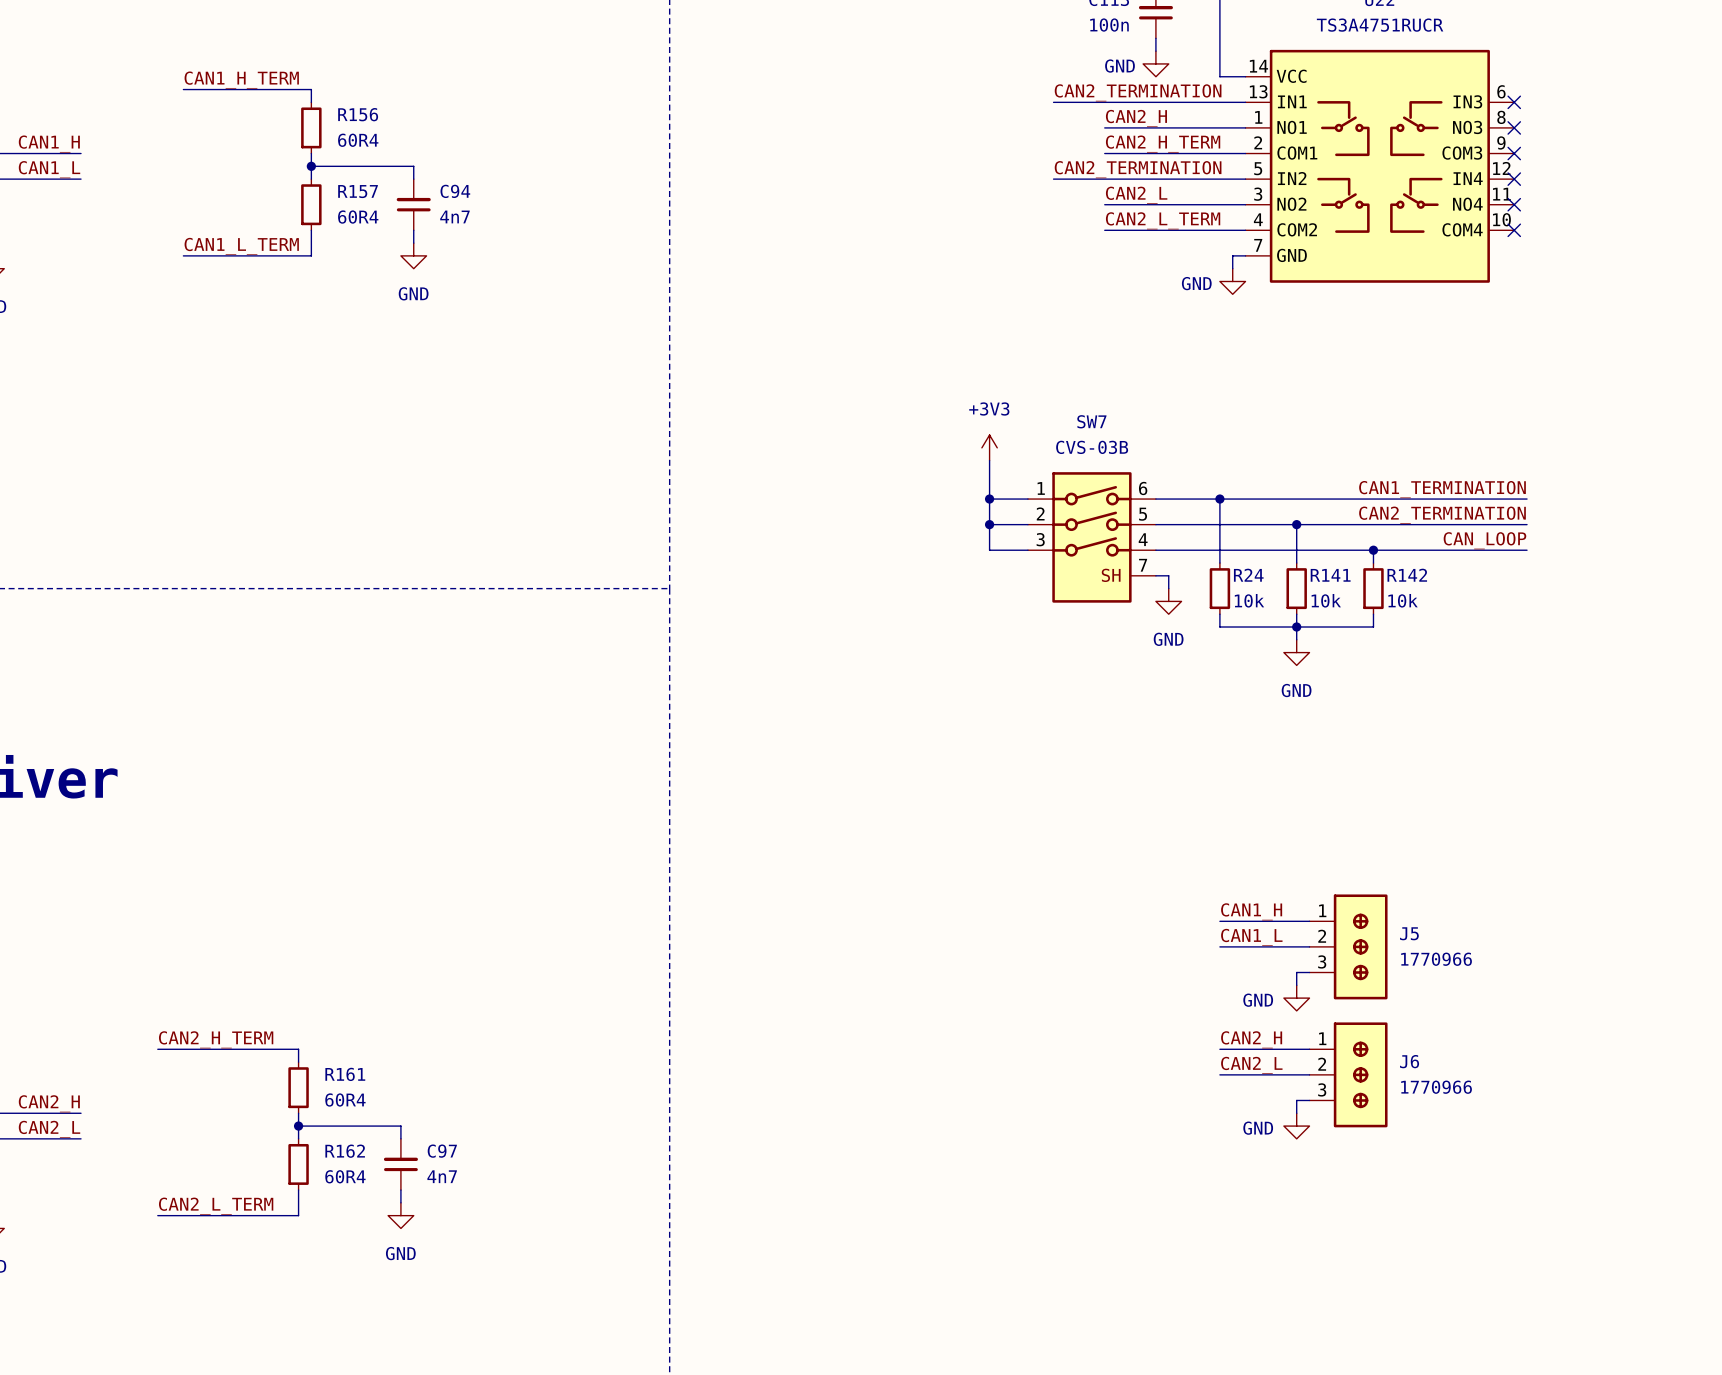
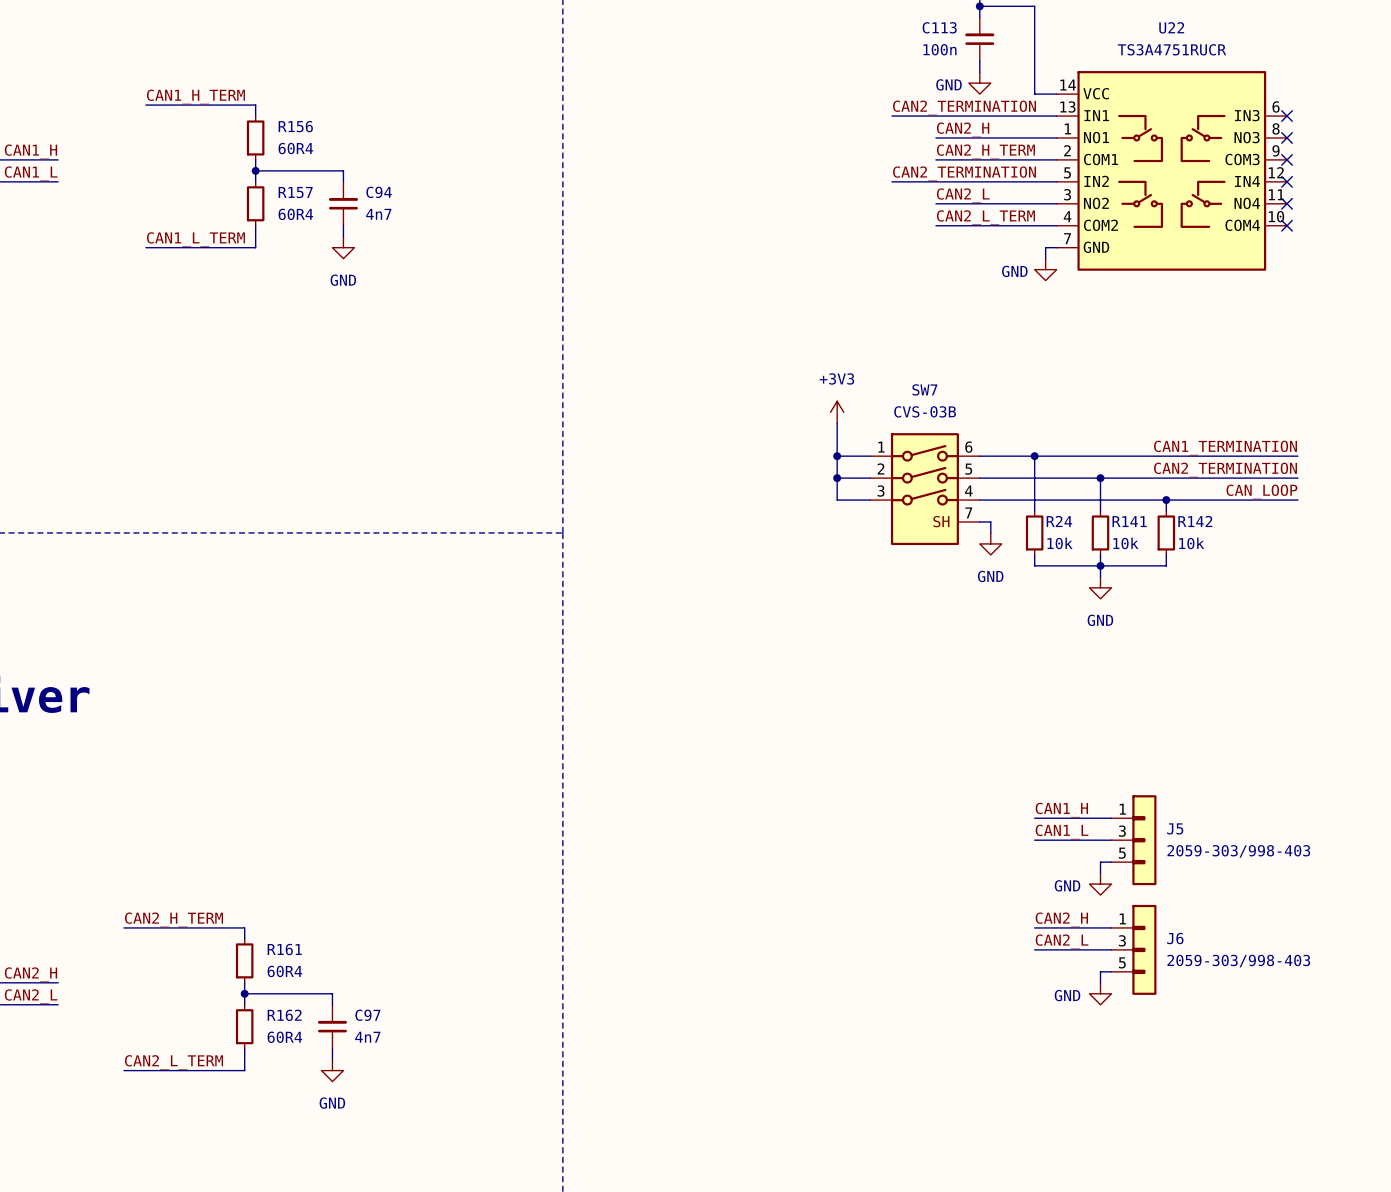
J5 symbol: [1309, 894, 1388, 1000] -> [1111, 795, 1157, 886]
J5 text: 1770966 (1436, 959) -> 2059-303/998-403 (1238, 851)
J6 symbol: [1309, 1022, 1388, 1128] -> [1111, 904, 1157, 995]
J6 text: 1770966 (1436, 1087) -> 2059-303/998-403 (1238, 961)

